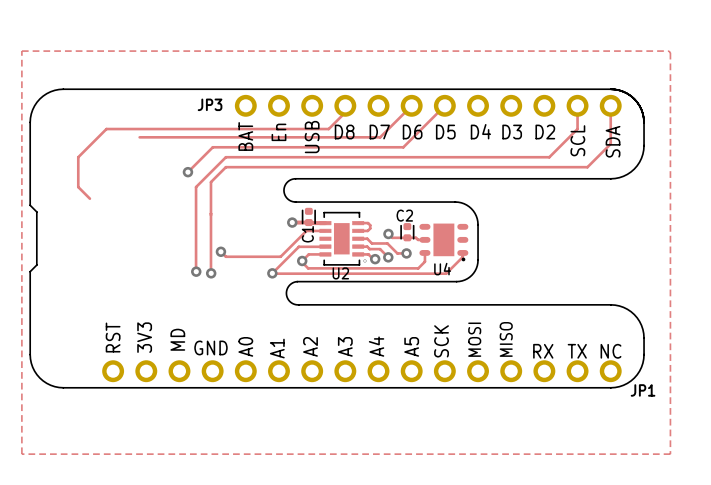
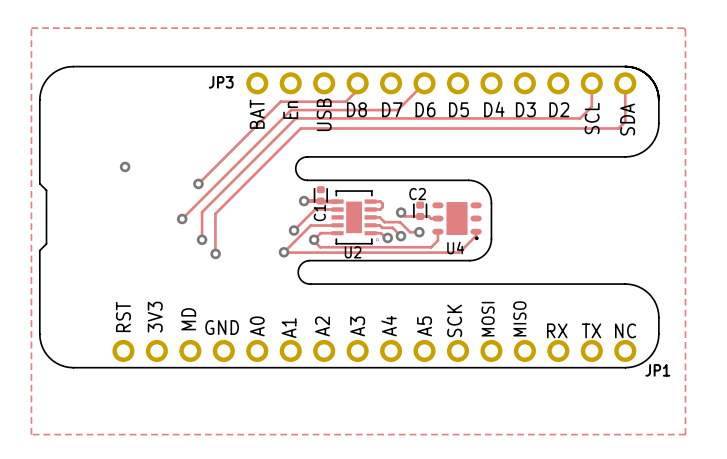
track: (444, 105) (403, 147) (212, 147) (187, 172) -> none
track: (333, 124) (328, 129) (106, 129) (78, 157) (78, 187) (89, 198) -> (345, 101) (280, 101) (237, 145)
track: (385, 132) (380, 137) (139, 137) -> (397, 110) (291, 110) (182, 219)
track: (565, 140) (549, 157) (225, 157) (196, 187) (196, 271) -> (580, 118) (295, 118) (202, 212) (202, 239)
track: (604, 150) (587, 167) (225, 167) -> (618, 128) (300, 128) (215, 213) (215, 253)
via: (187, 172) -> none
track: (210, 182) (211, 273) -> (222, 160) (198, 183)
via: none -> (125, 166)
via: none -> (198, 183)
track: (306, 230) (280, 256) (225, 256) (220, 251) -> (318, 209) (315, 209) (294, 230)
via: none -> (182, 219)
via: (220, 251) -> none
via: none -> (294, 230)
via: none -> (202, 239)
via: (196, 271) -> none
via: (211, 273) -> none
via: none -> (215, 253)

